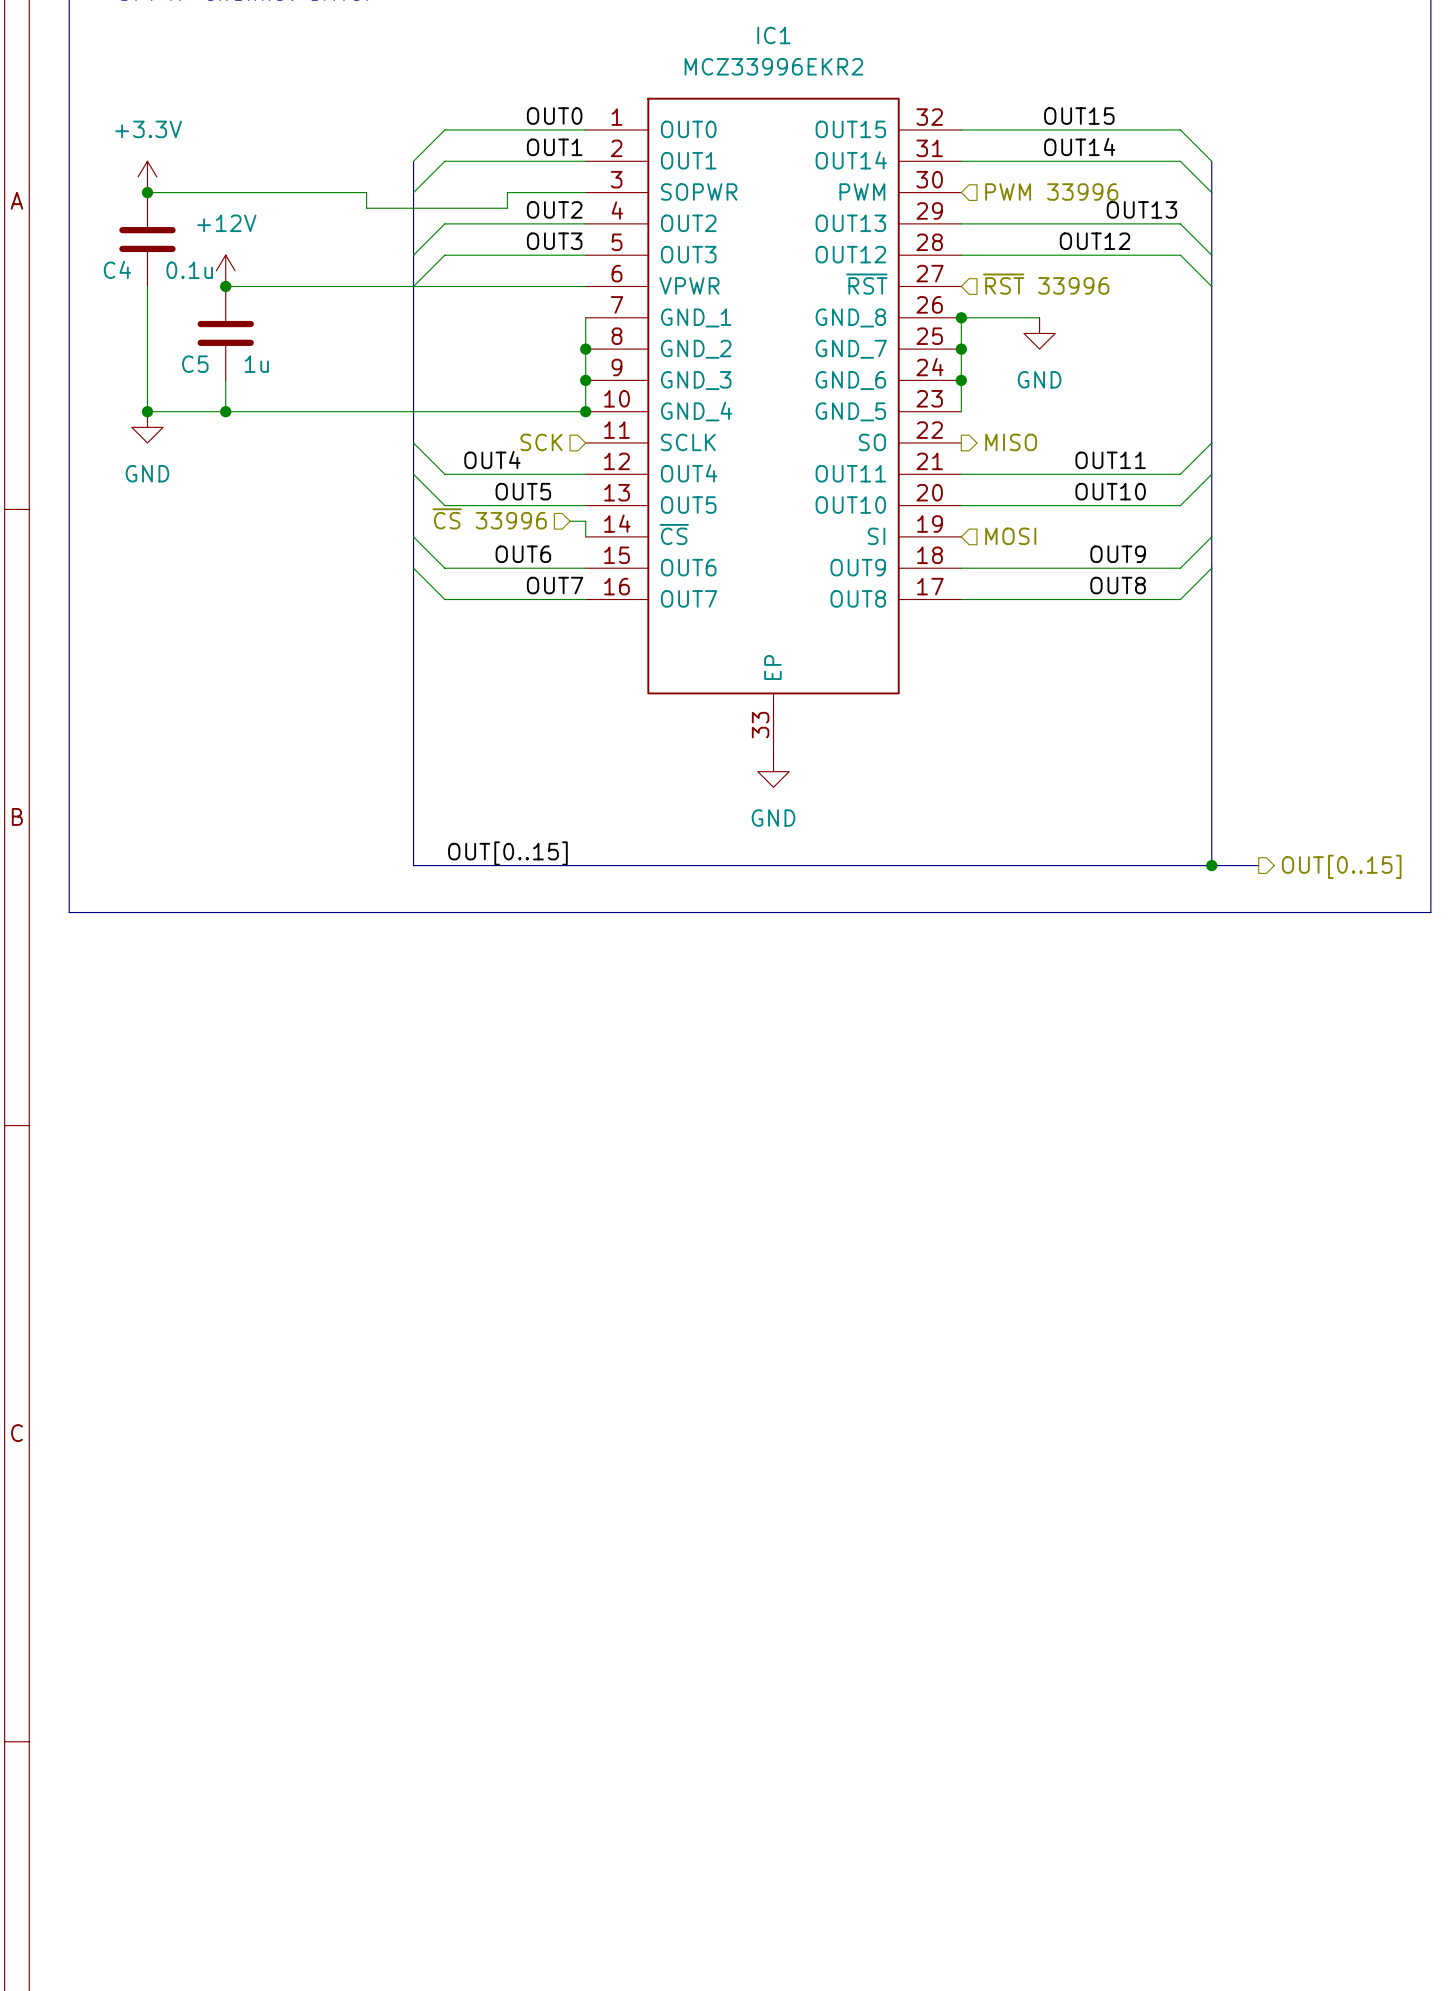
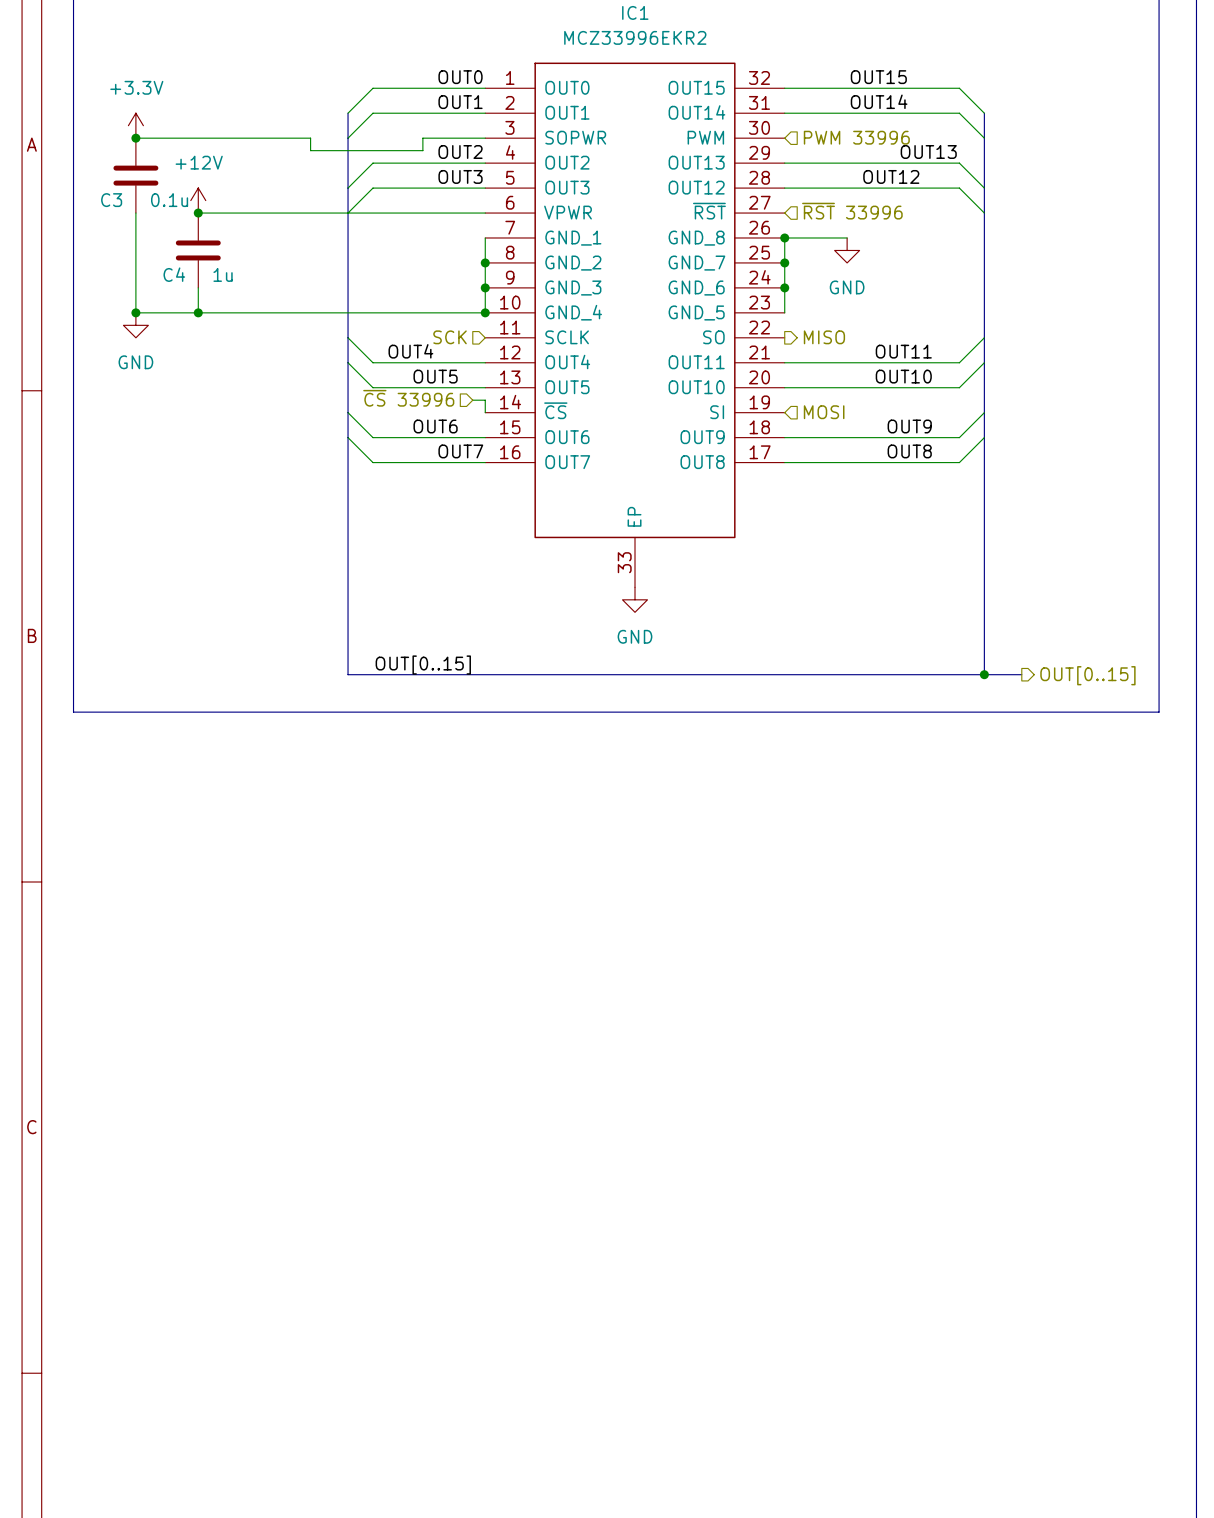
C4 name: C4 (117, 269) -> C3 (111, 200)
C5 name: C5 (195, 364) -> C4 (174, 274)

